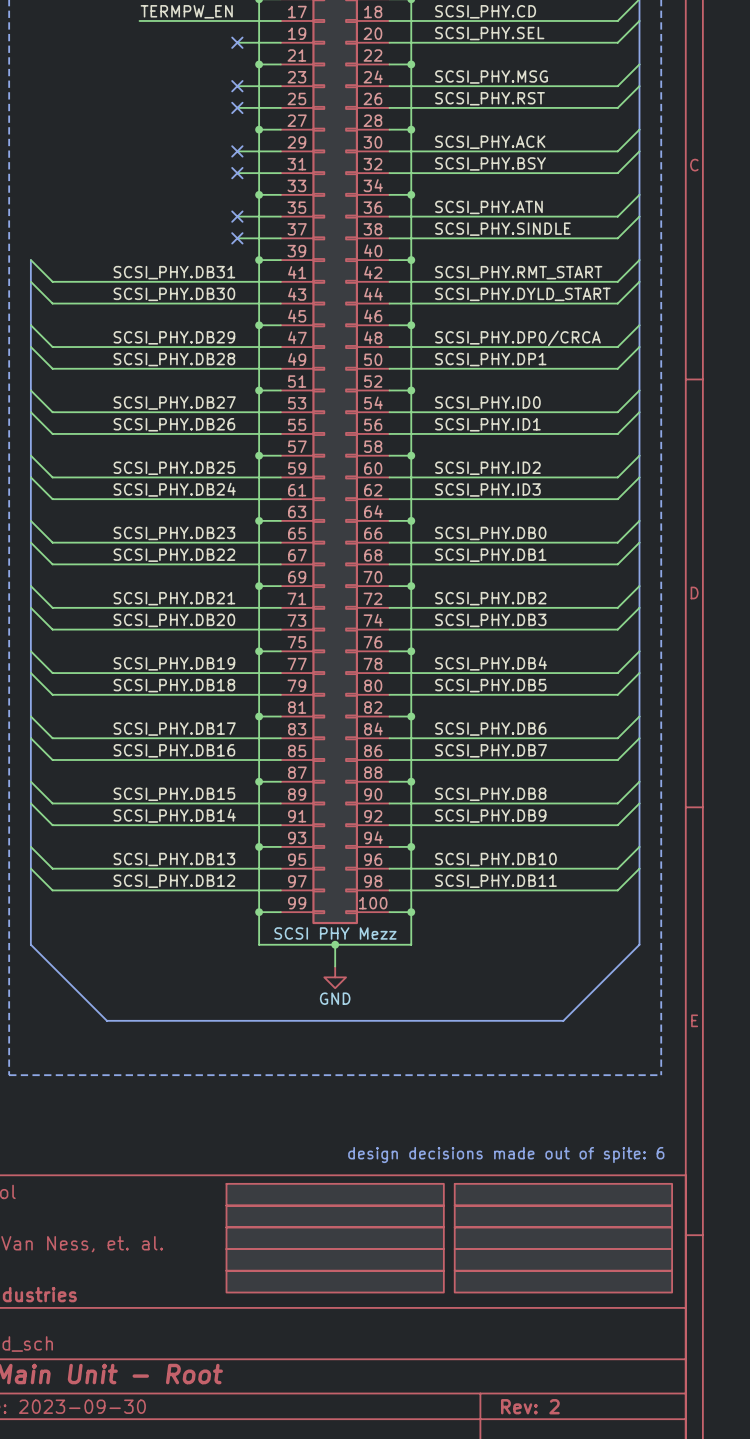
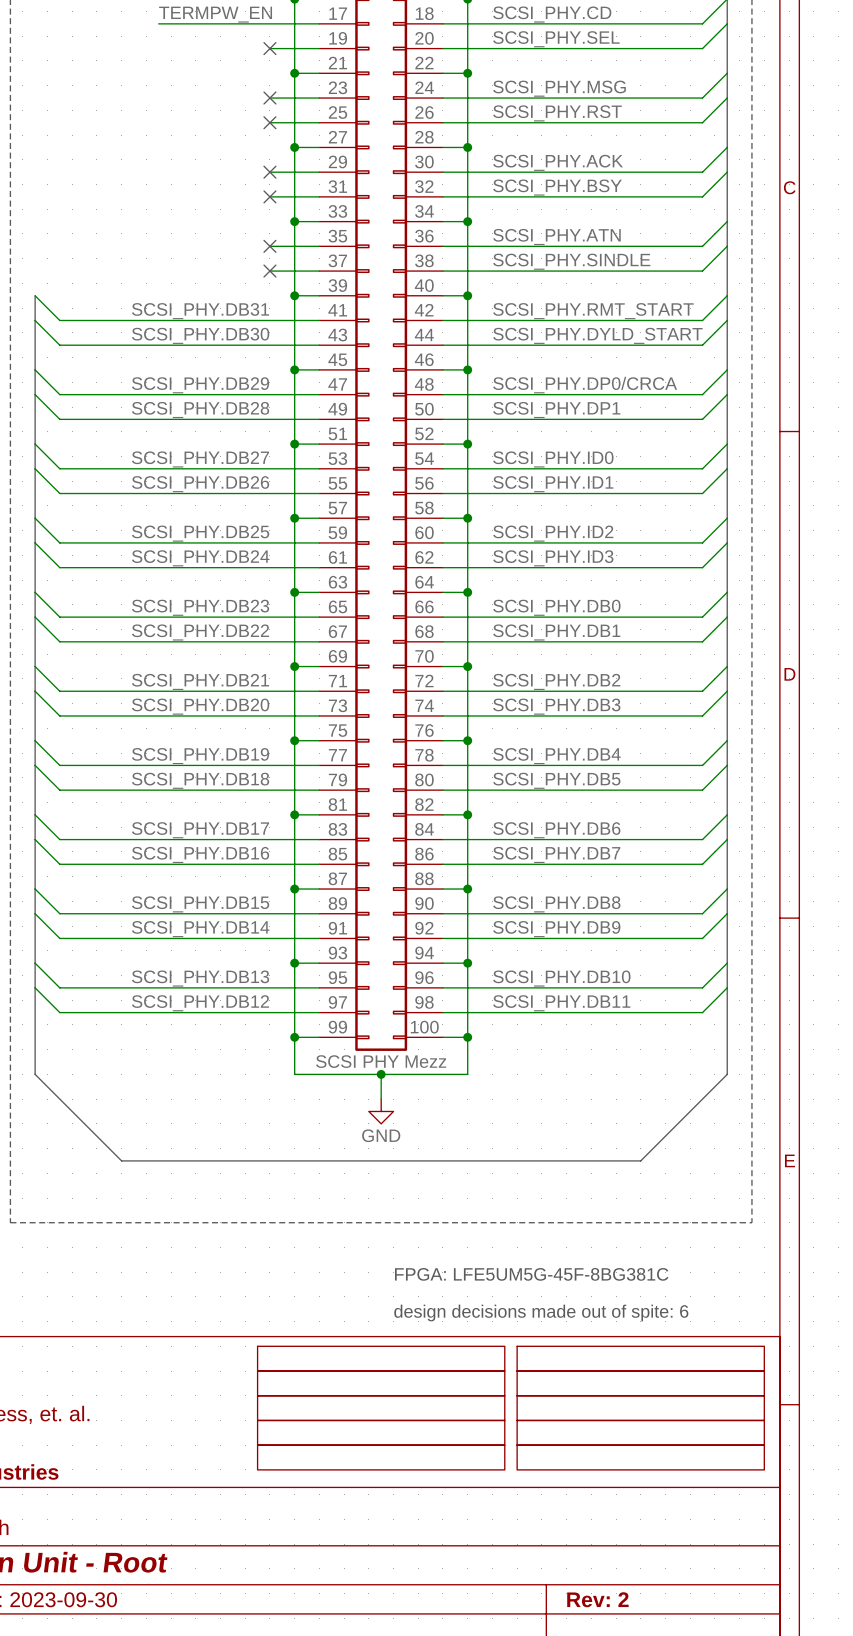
text: none -> FPGA: LFE5UM5G-45F-8BG381C (531, 1274)

